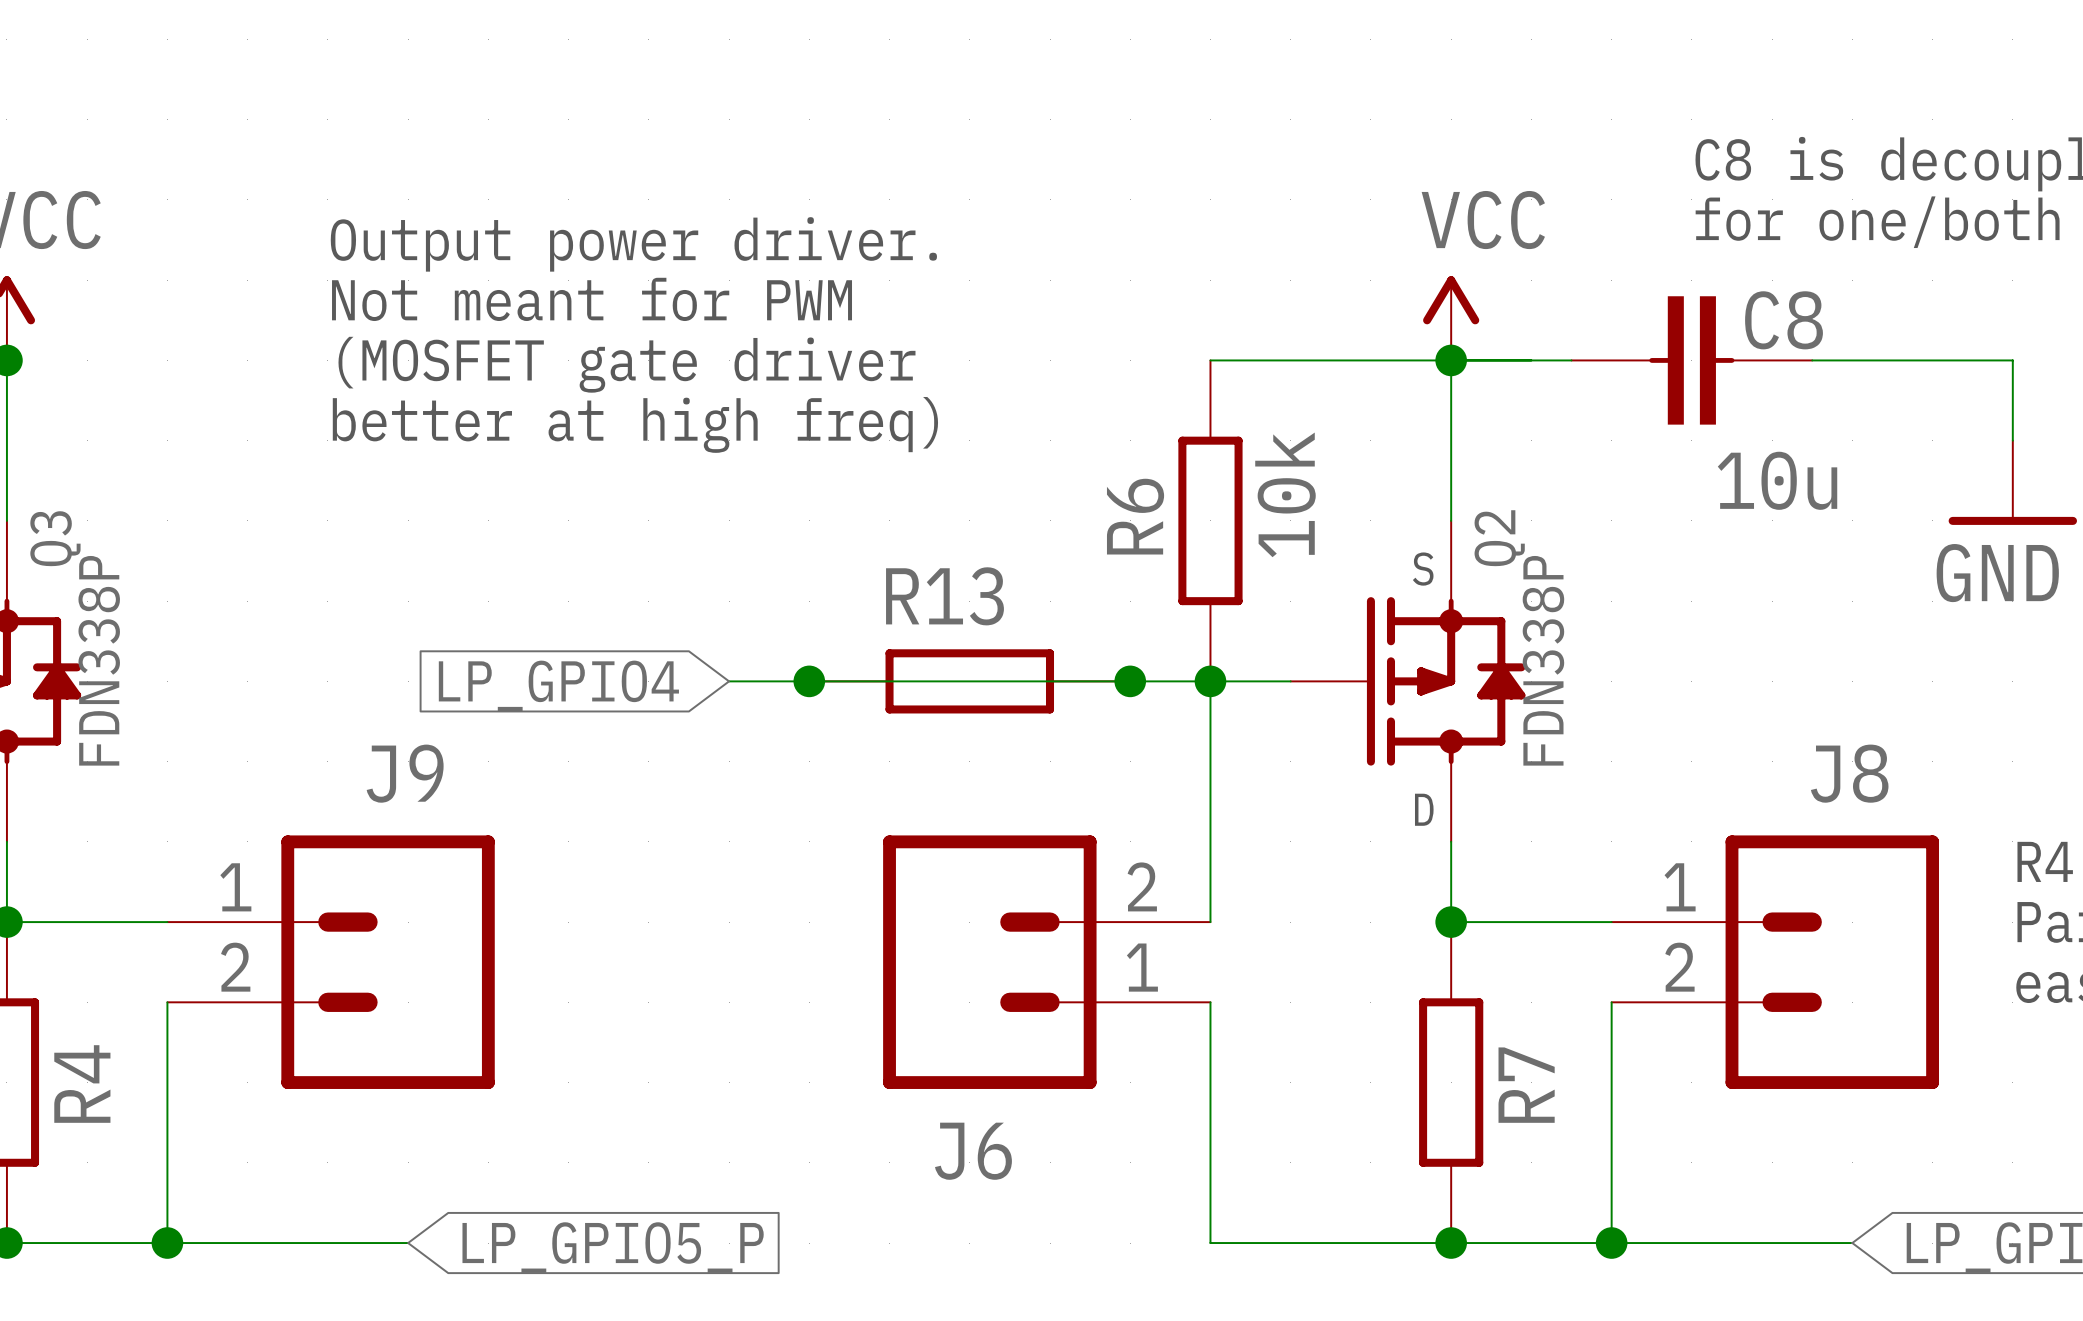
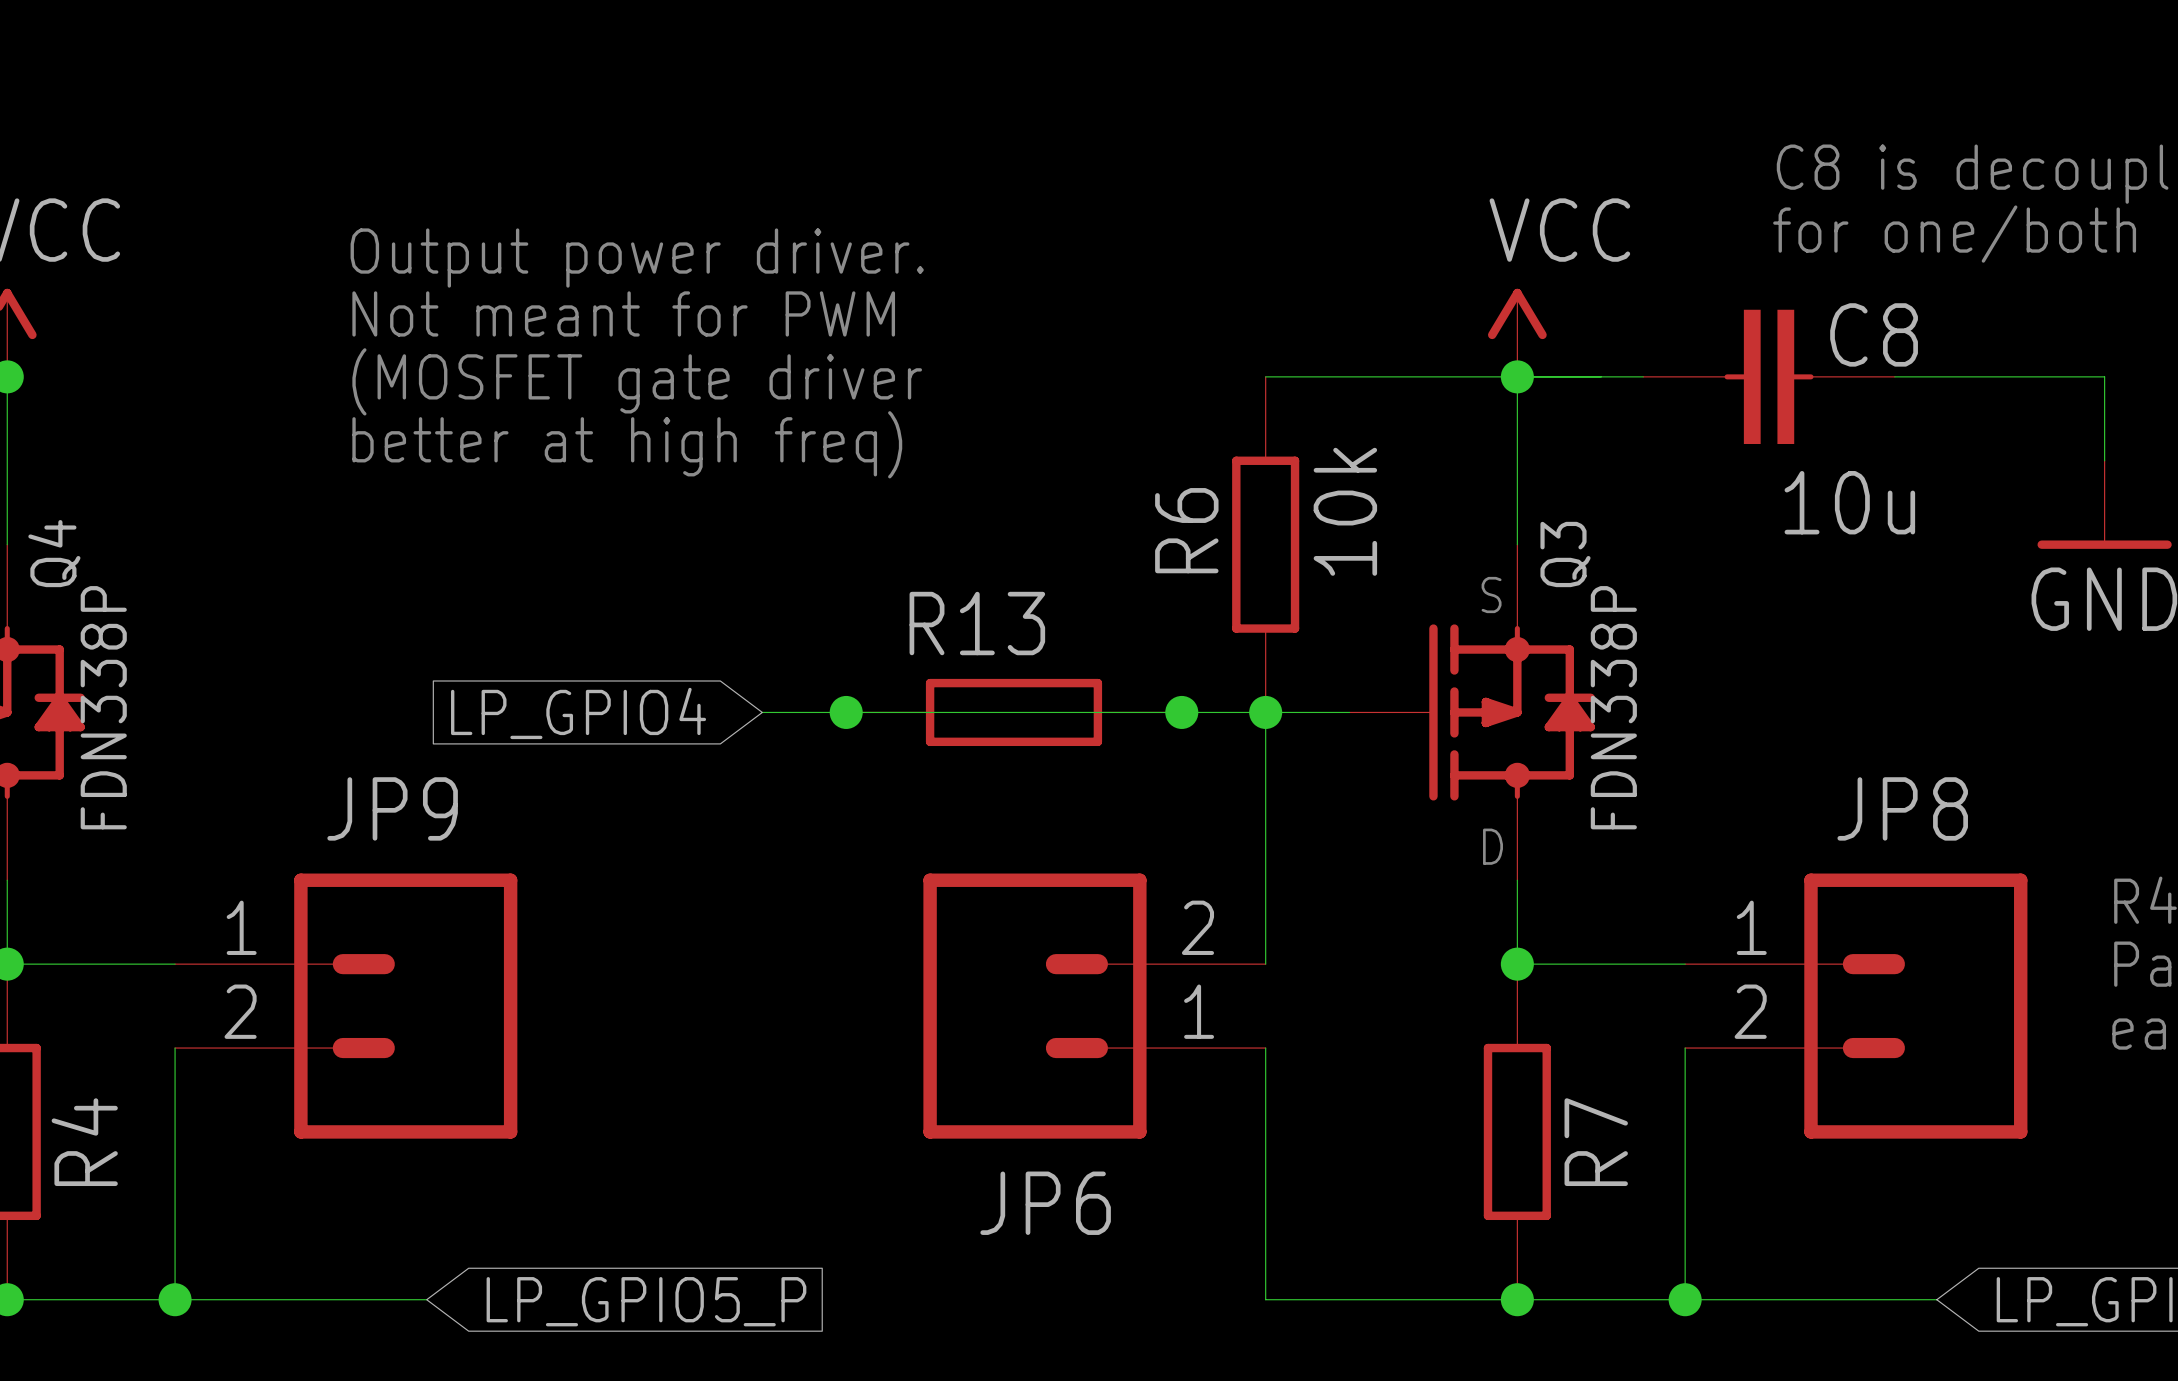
Q3 name: Q3 (55, 538) -> Q4 (54, 553)
Q2 name: Q2 (1499, 538) -> Q3 (1565, 554)
J9 name: J9 (405, 773) -> JP9 (392, 808)
J8 name: J8 (1849, 773) -> JP8 (1902, 808)
J6 name: J6 (973, 1151) -> JP6 (1045, 1203)

